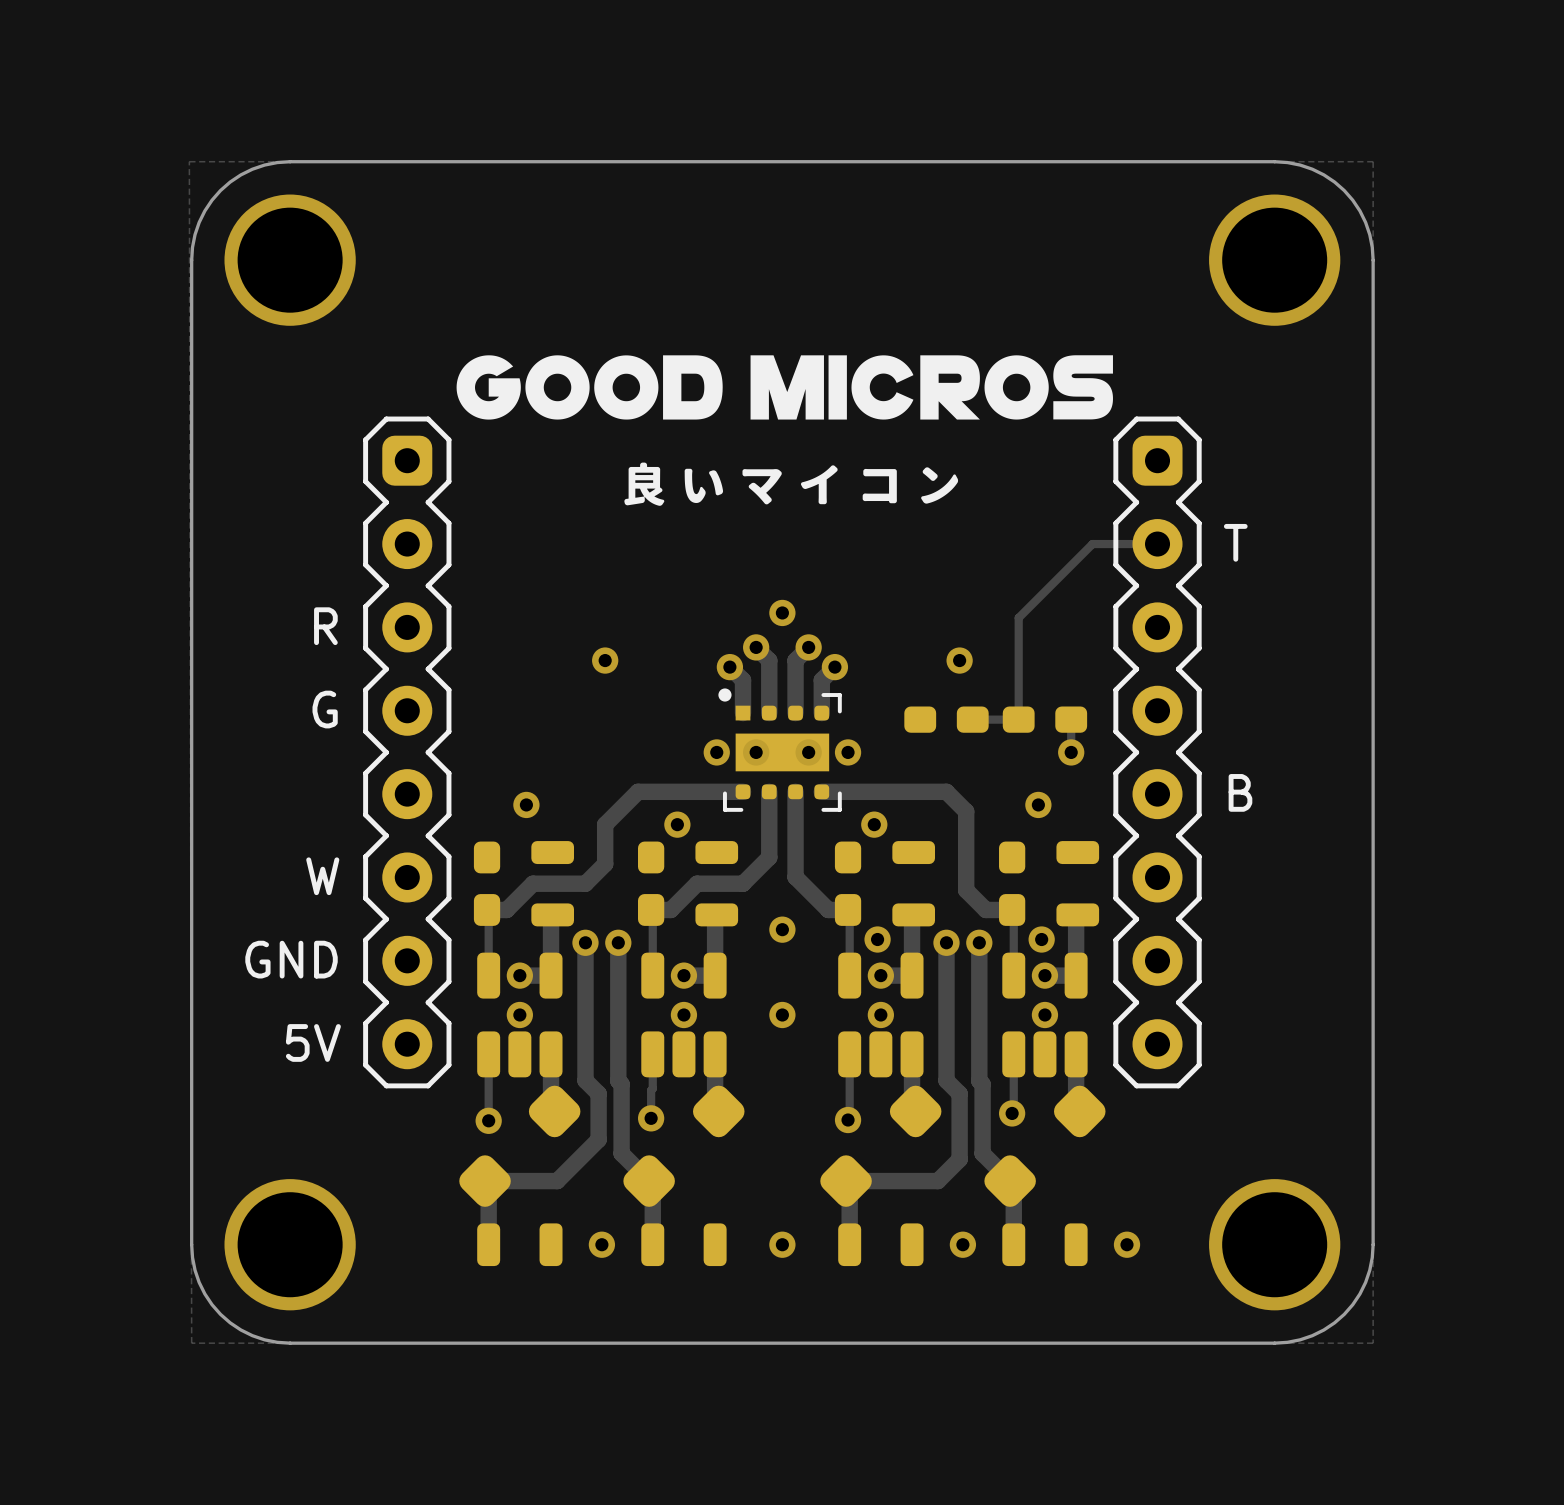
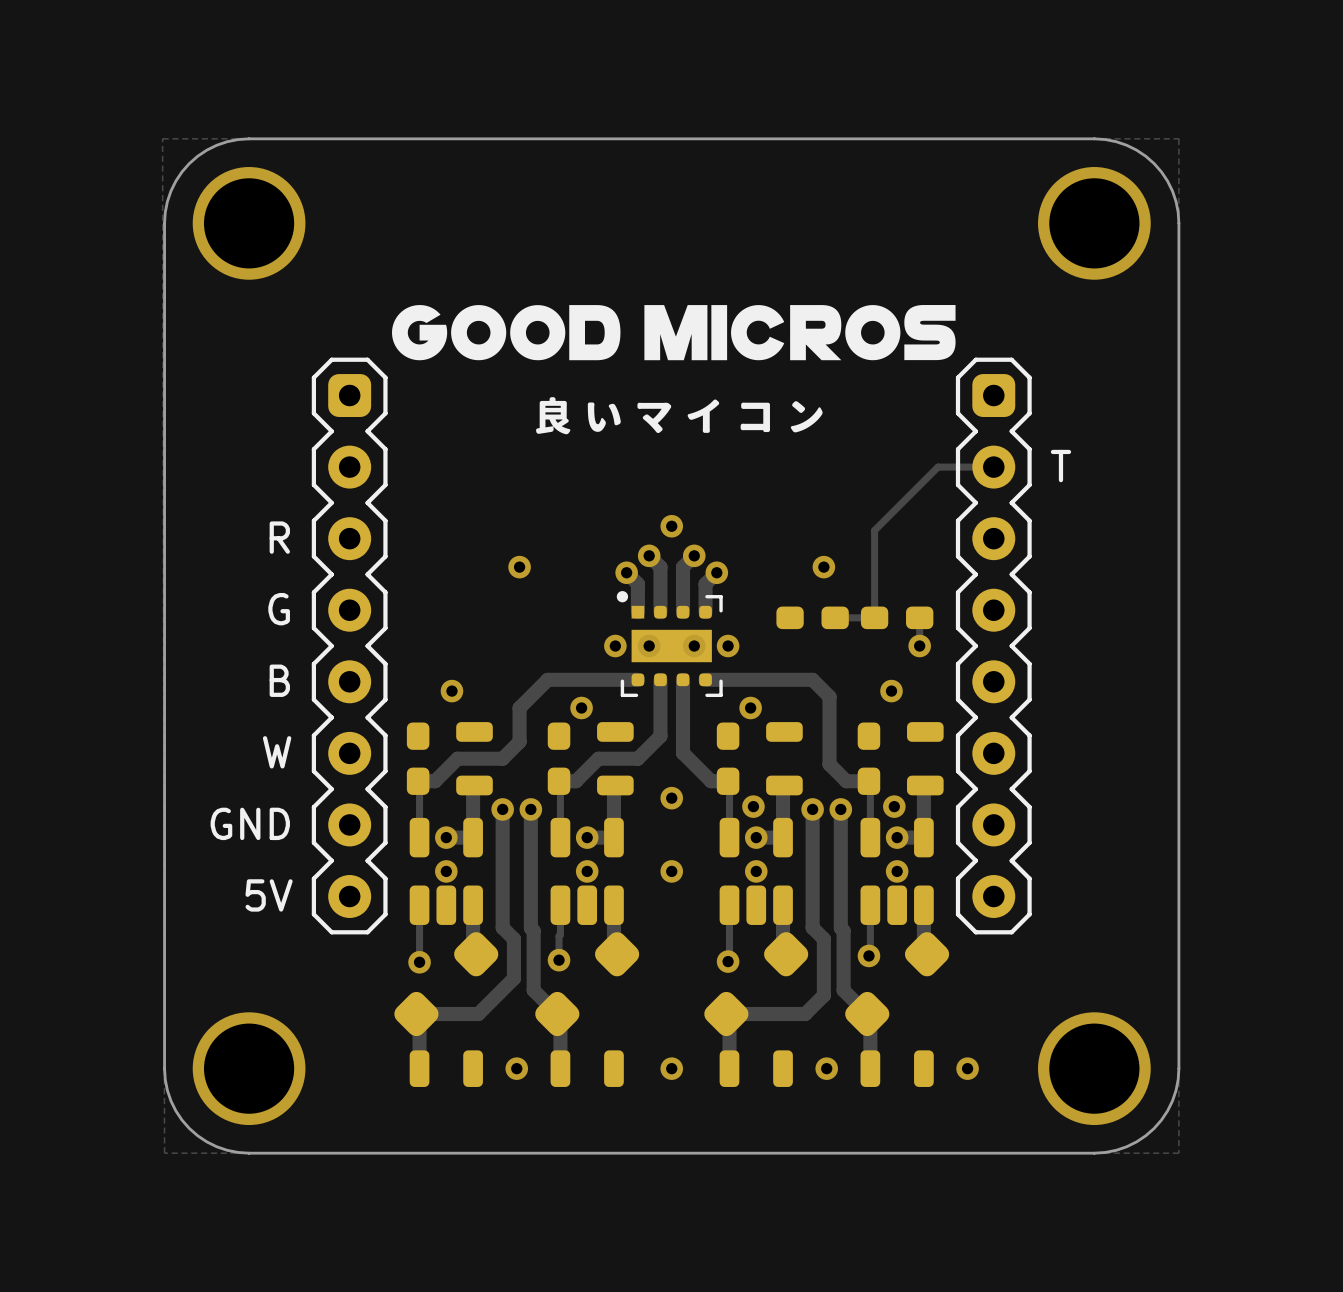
text: none -> B (279, 680)
text: B (1240, 792) -> none

